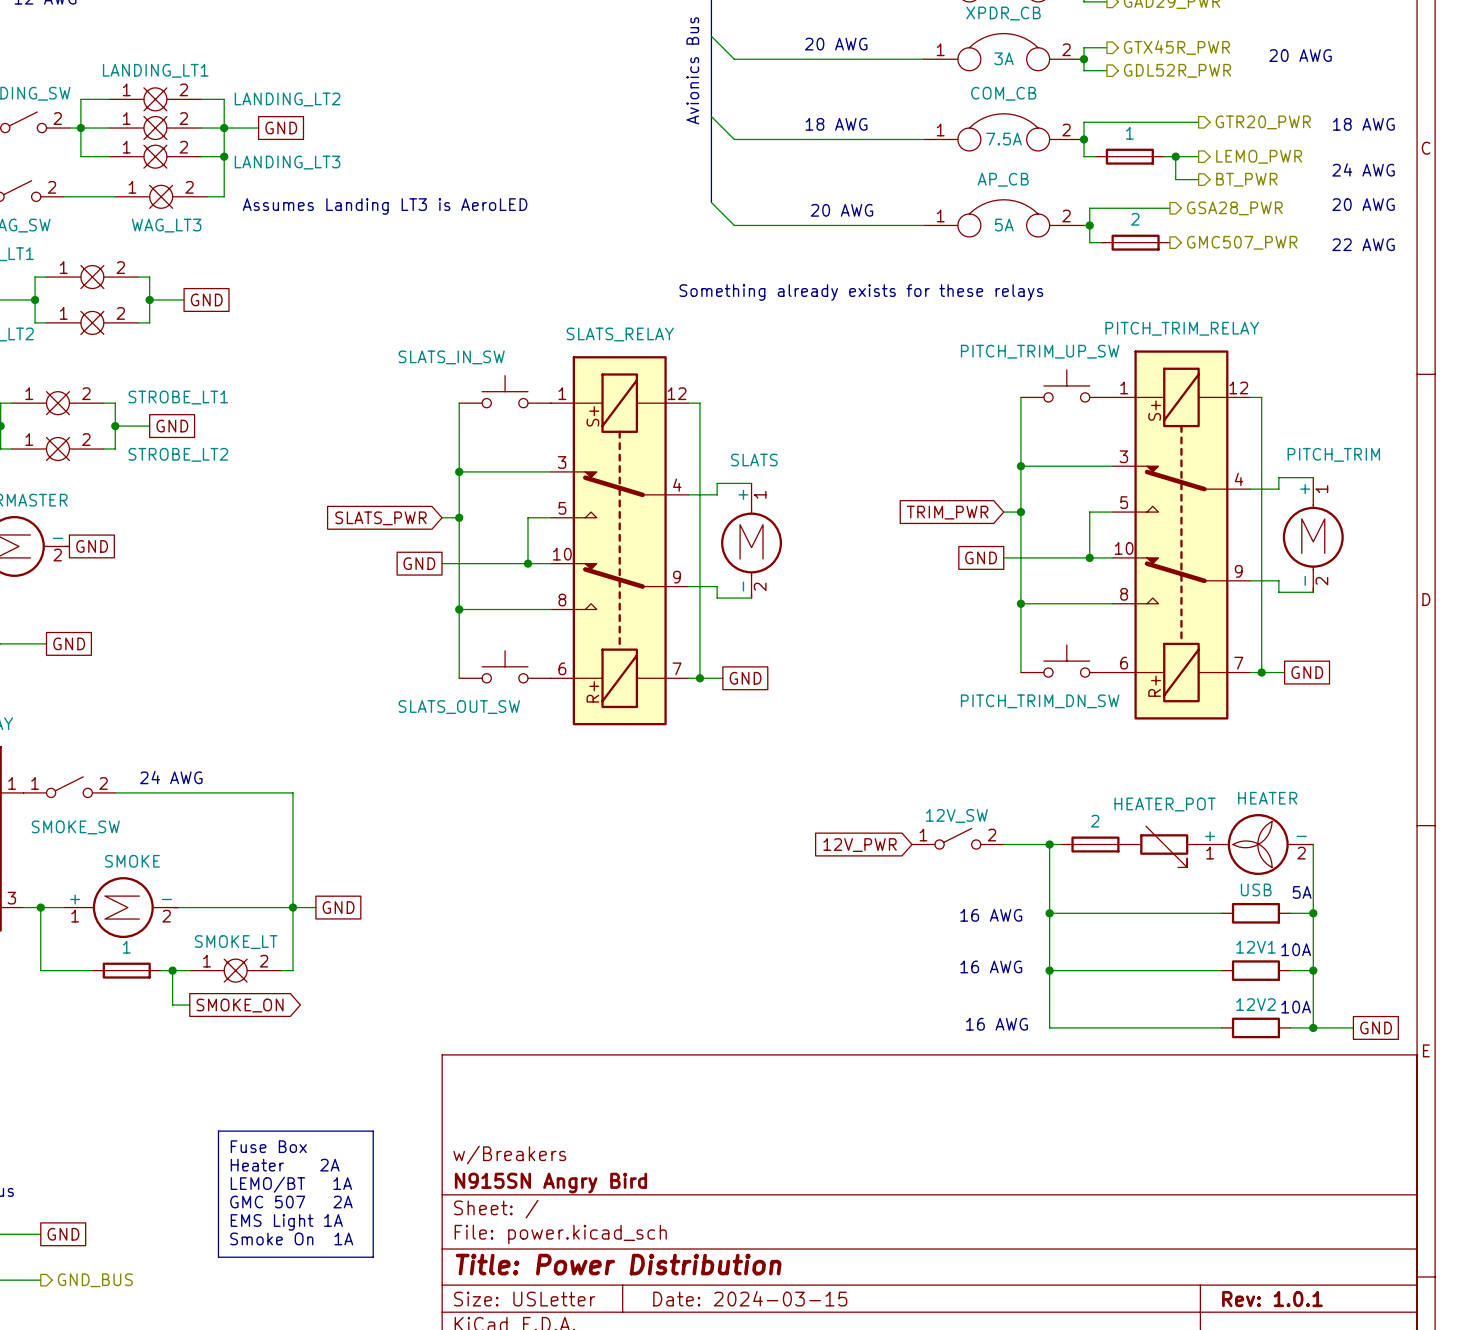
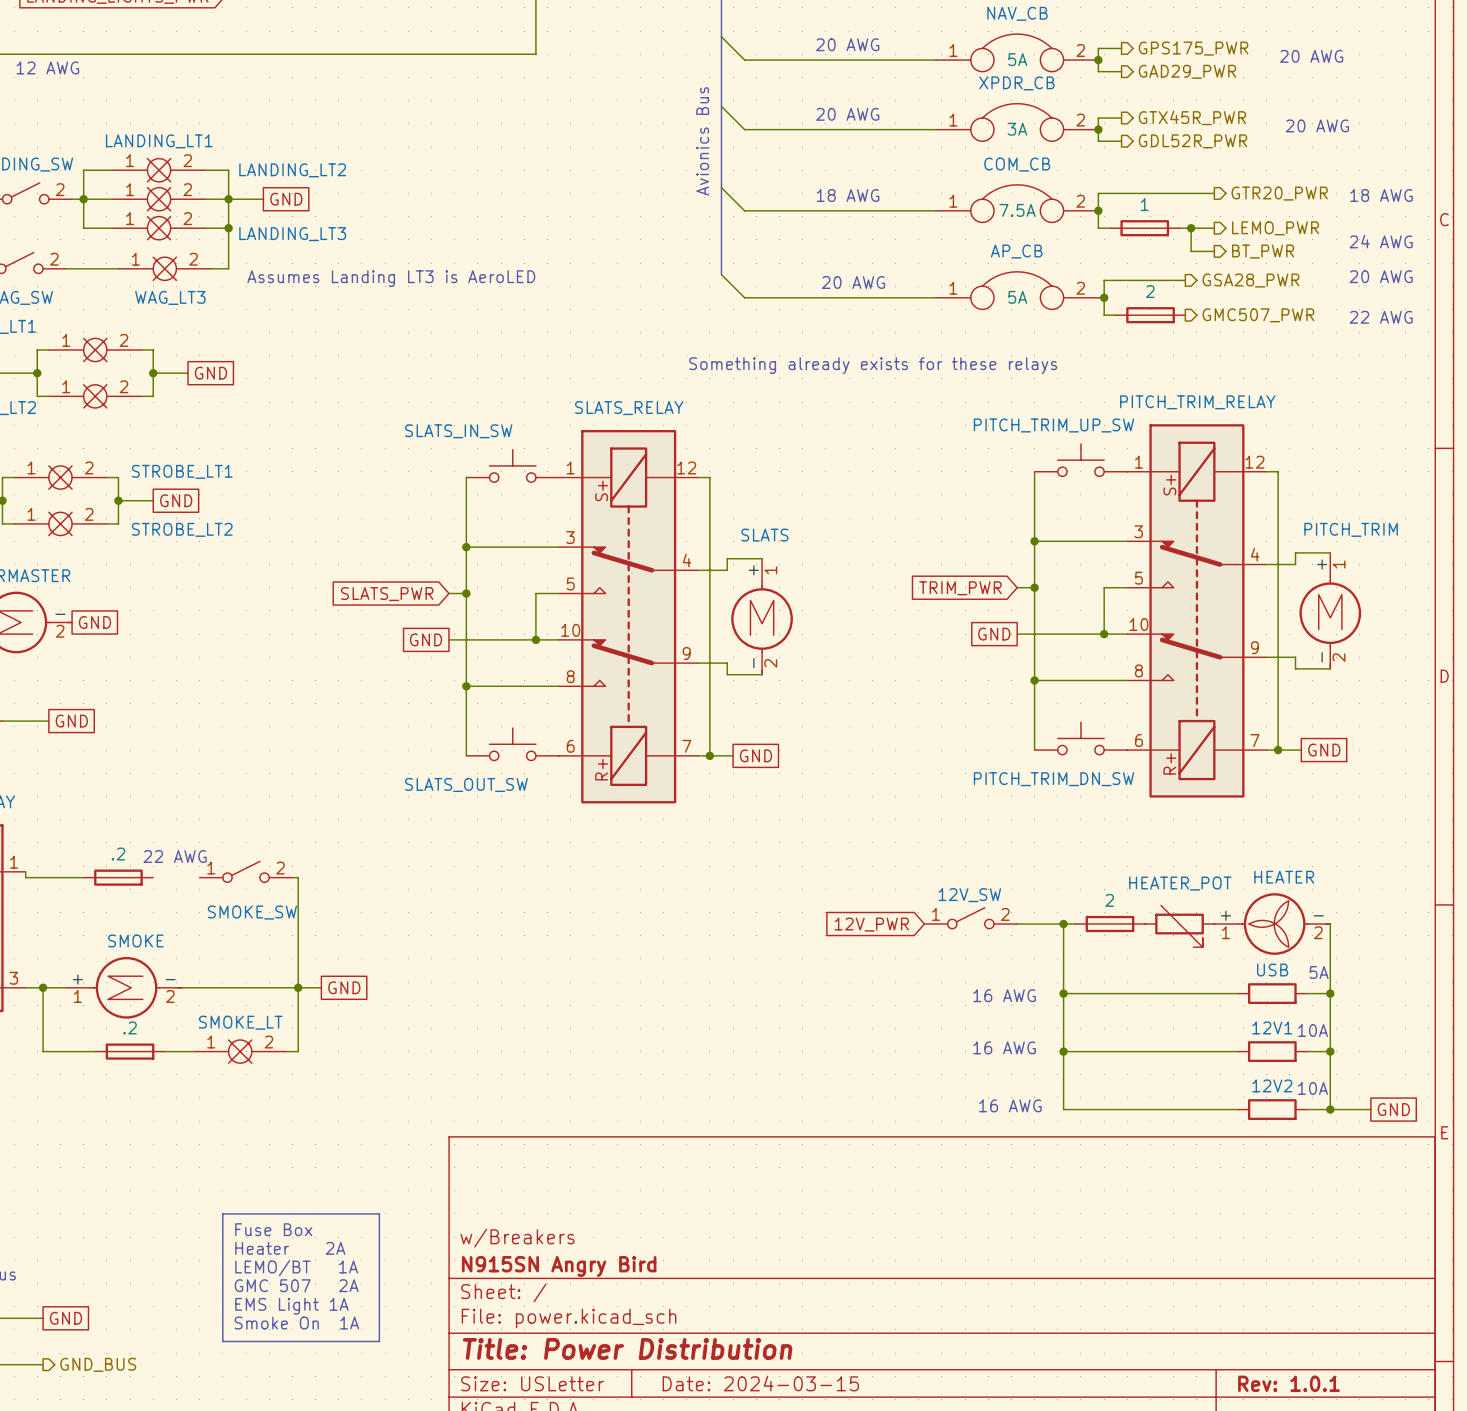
text: 24 AWG (171, 777) -> 22 AWG (175, 856)
SMOKE_SW position: (69, 787) -> (246, 871)
wire: none -> (25, 871) (25, 877) (83, 877)
wire: (115, 792) (292, 792) (292, 798) -> (292, 877) (298, 877)
part: none -> .2 (118, 877)
part value: 1 (126, 947) -> .2 (130, 1027)
wire: (172, 970) (172, 1005) (189, 1005) -> none
junction: (172, 970) -> none
global label: SMOKE_ON (240, 1005) -> none

